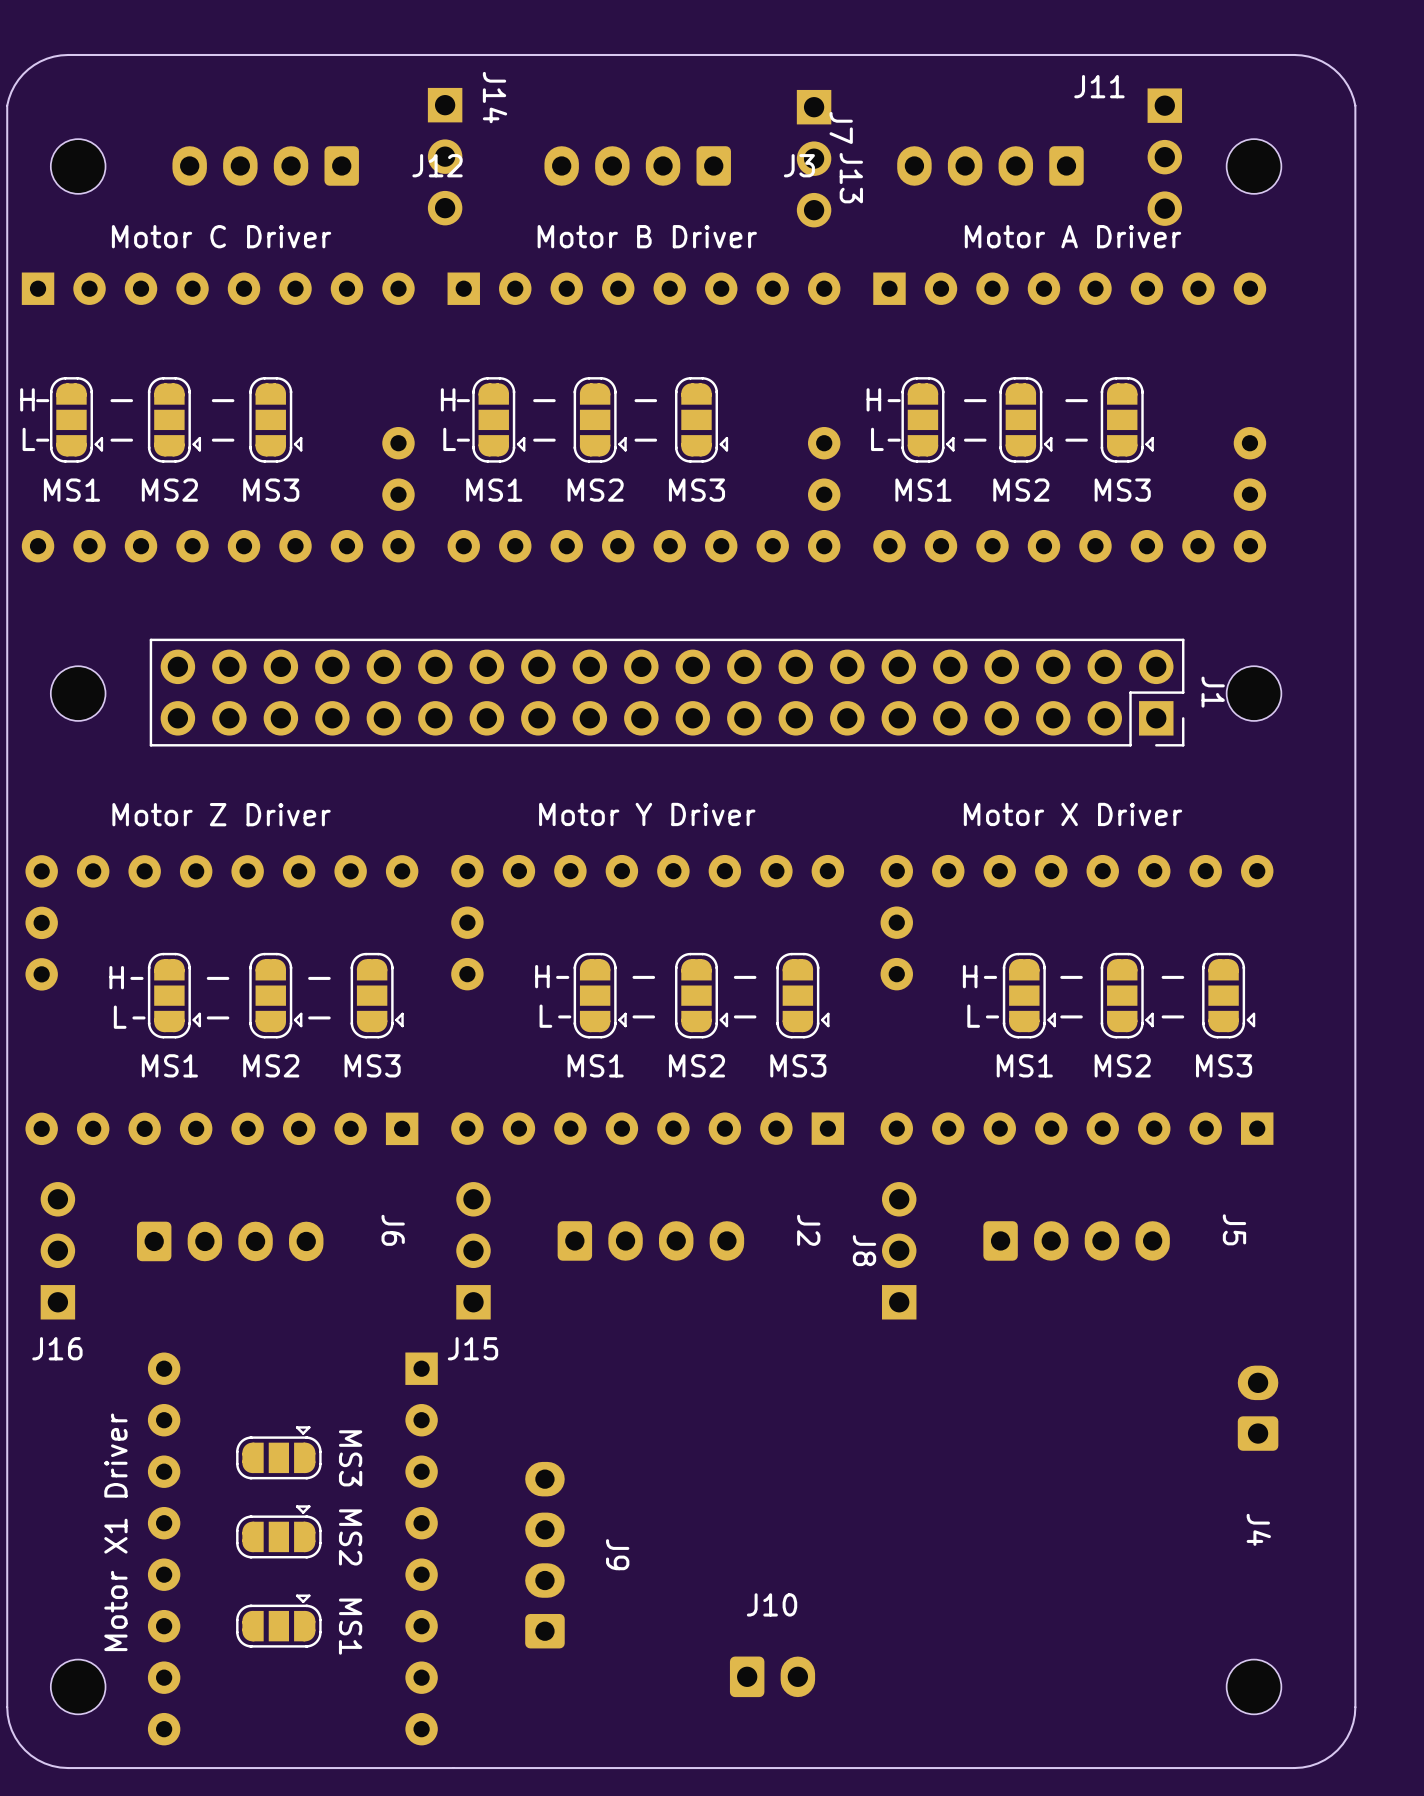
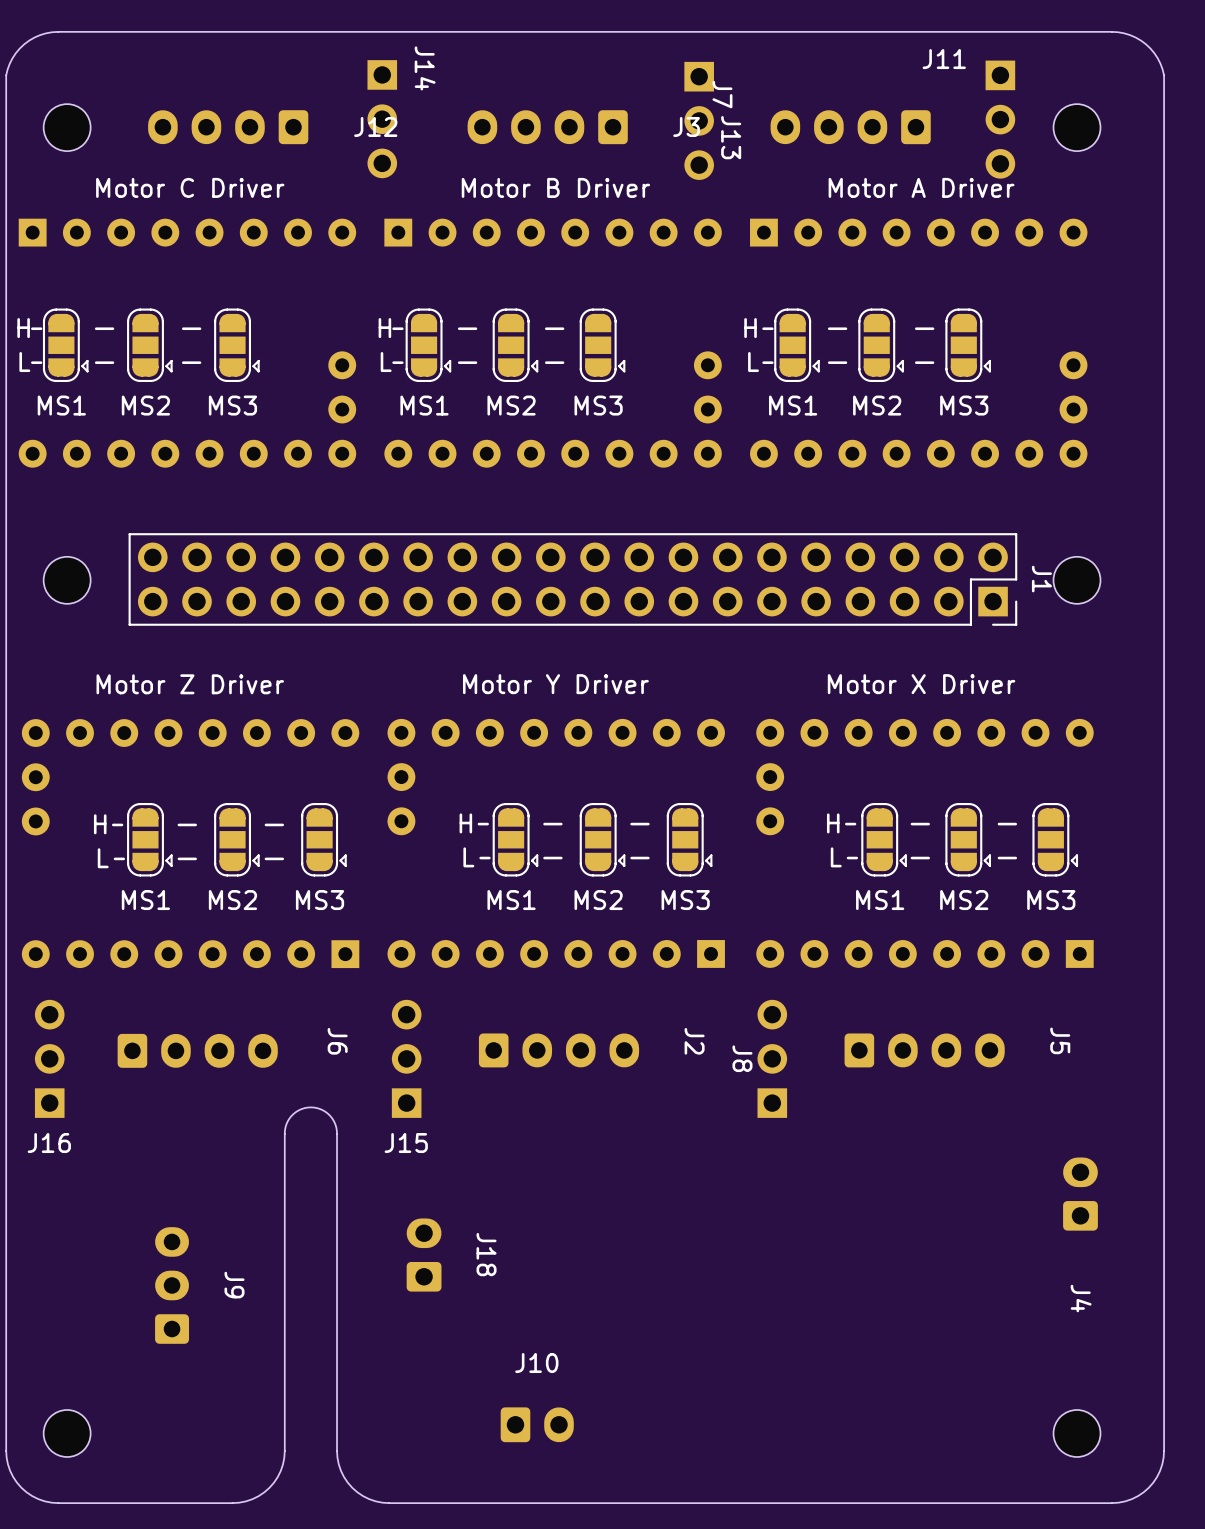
part: MS3 (278, 1452) -> none
J9 footprint: [525, 1461, 565, 1649] -> [155, 1227, 190, 1344]
J18: none -> (424, 1255)
part: MS2 (278, 1531) -> none
part: Motor X1 Driver (292, 1548) -> none
part: MS1 (278, 1621) -> none
J10 position: (772, 1676) -> (537, 1424)
board edge: (453, 1768) (270, 1768) -> (389, 1503) (369, 1499) (352, 1487) (340, 1470) (337, 1457) (336, 1130) (334, 1121) (328, 1114) (320, 1109) (310, 1107) (301, 1109) (293, 1114) (287, 1121) (284, 1130) (284, 1457) (277, 1477) (269, 1487) (252, 1499) (232, 1503)

